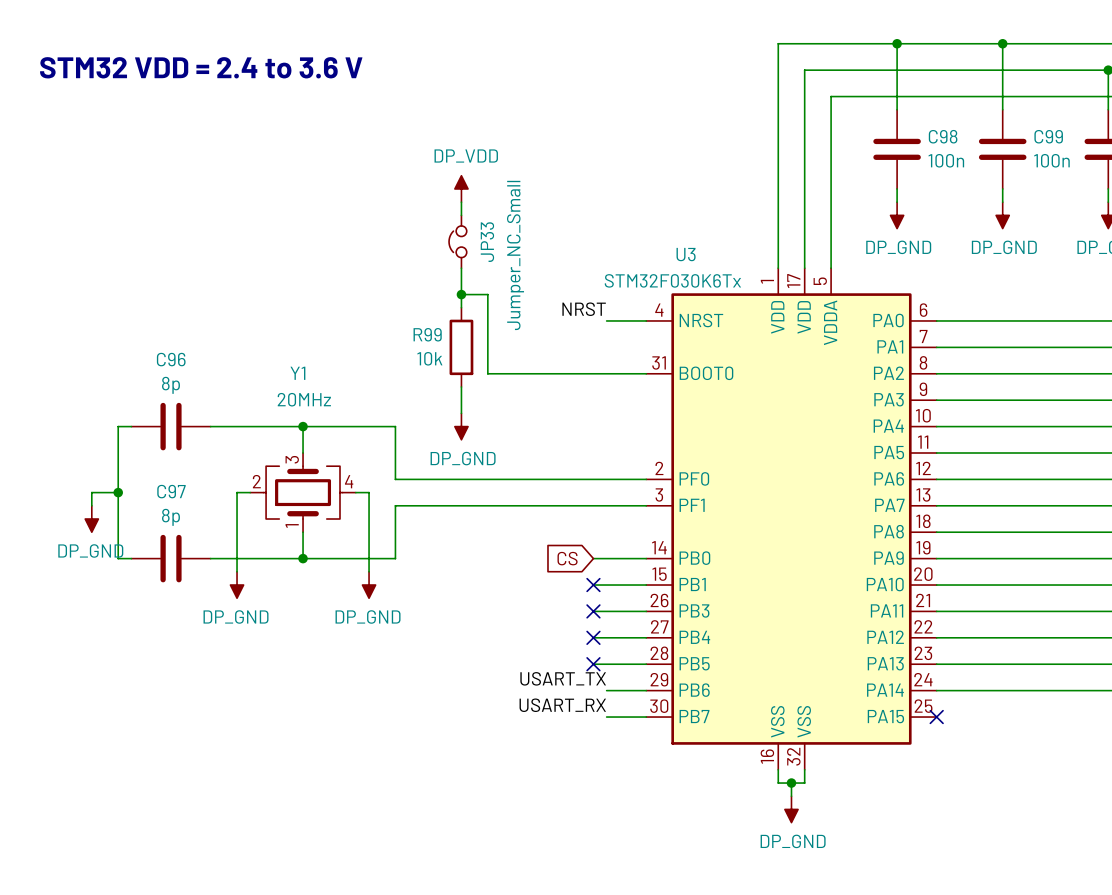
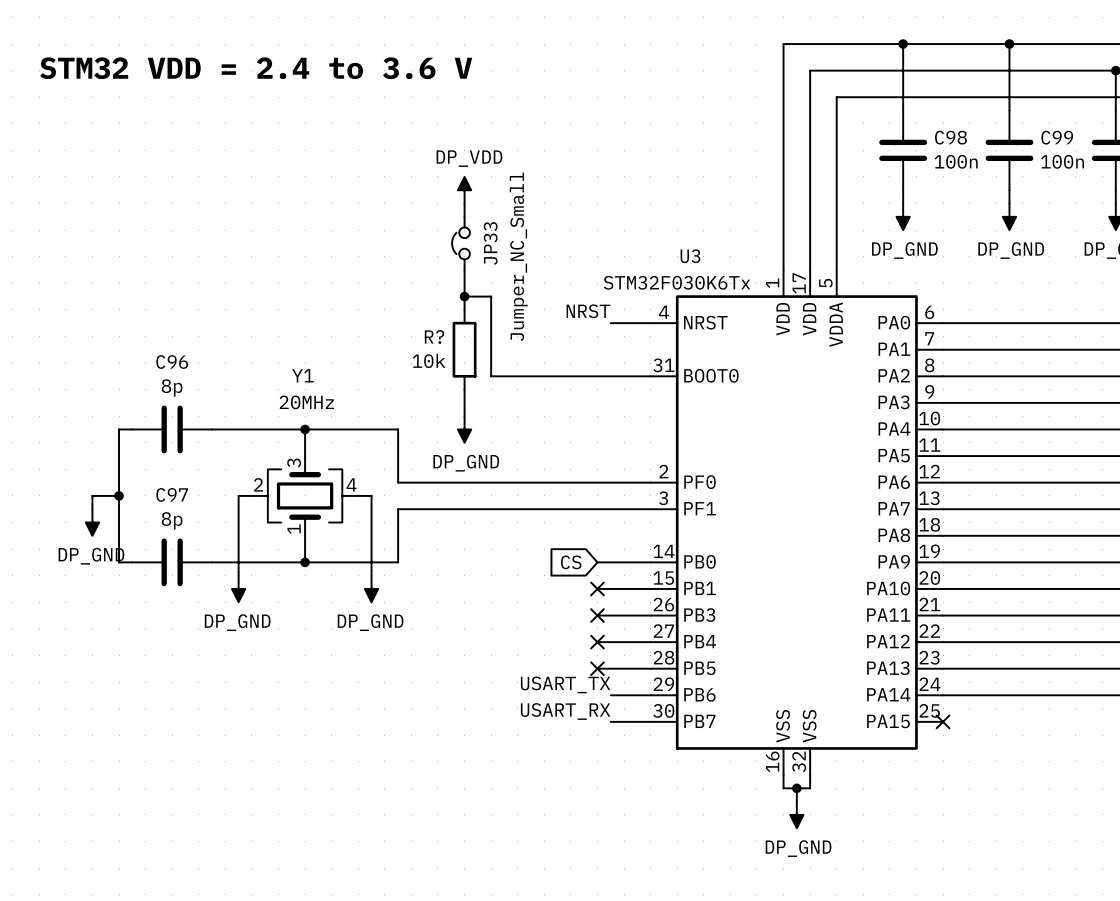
R99 name: R99 (427, 334) -> R? (434, 336)

